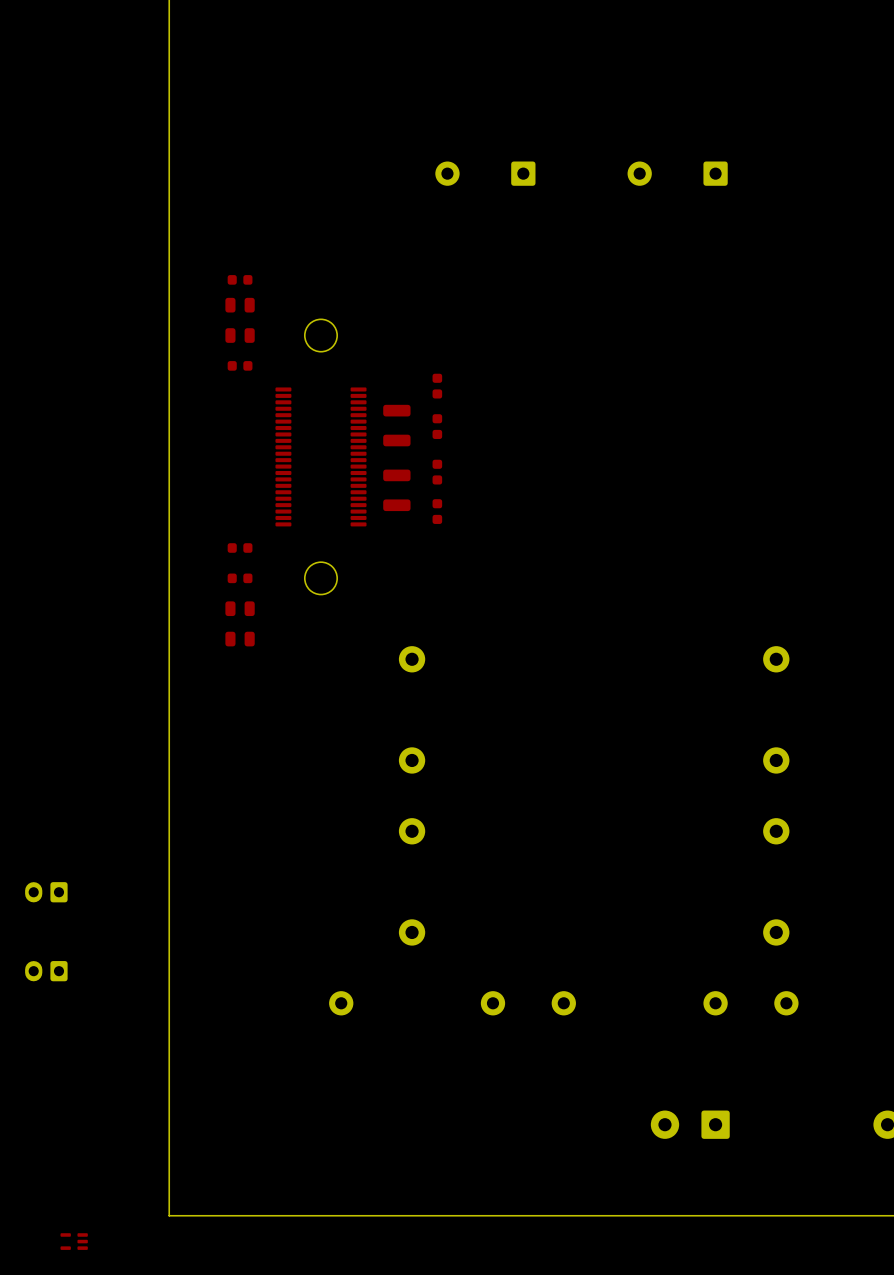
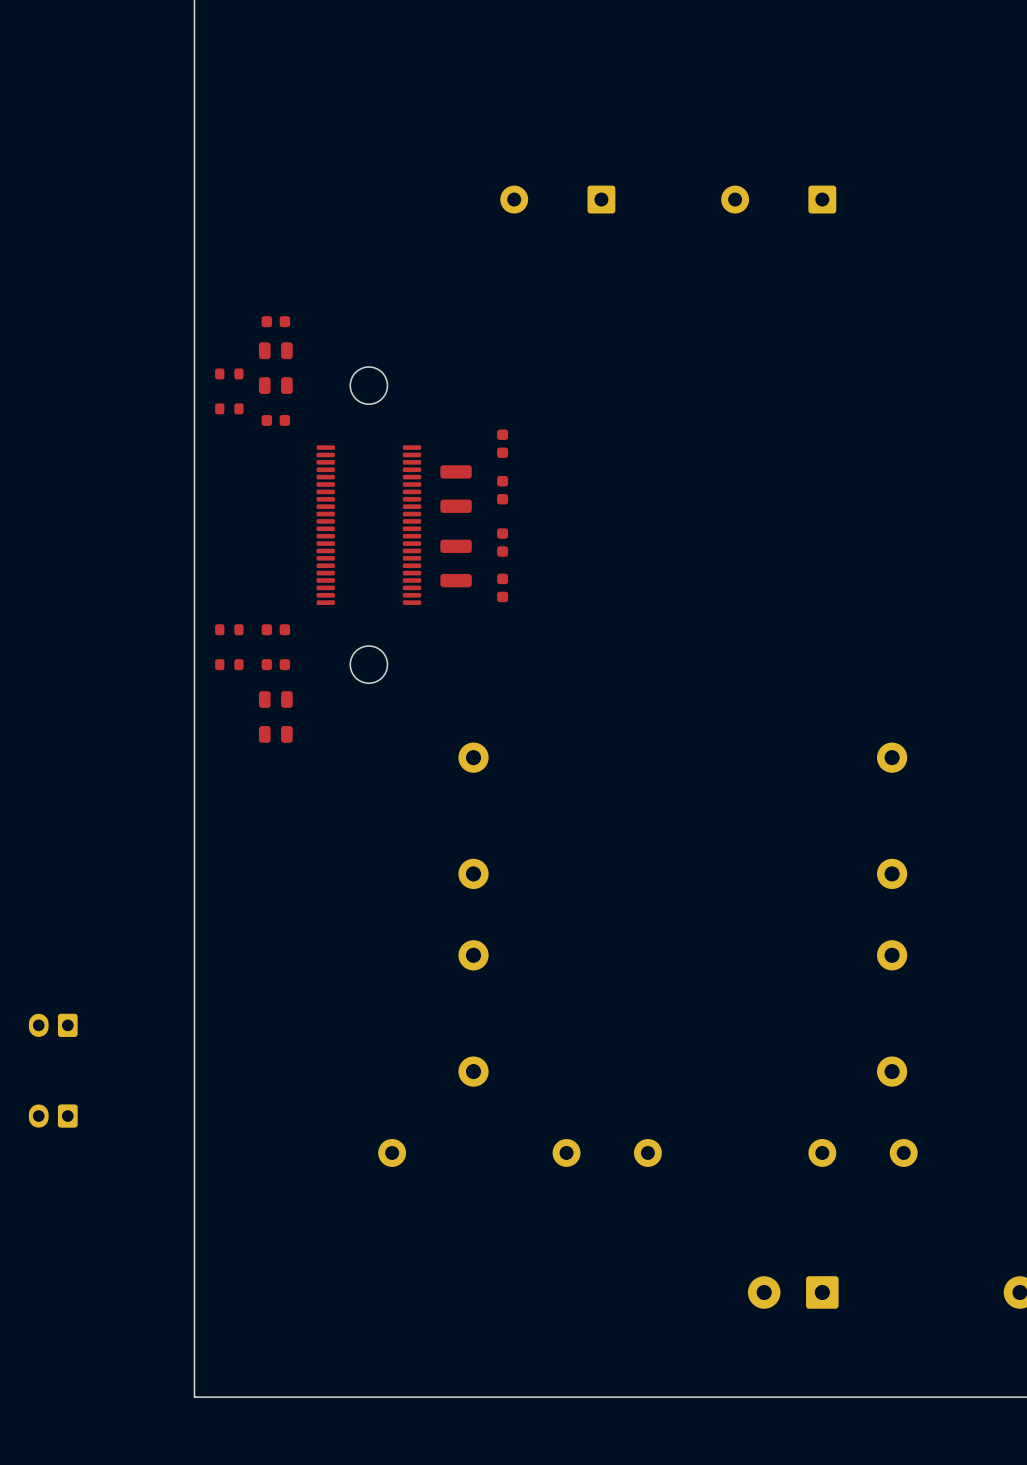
part: none -> (229, 373)
part: none -> (229, 408)
part: none -> (229, 629)
part: none -> (229, 664)
part: (74, 1241) -> none

